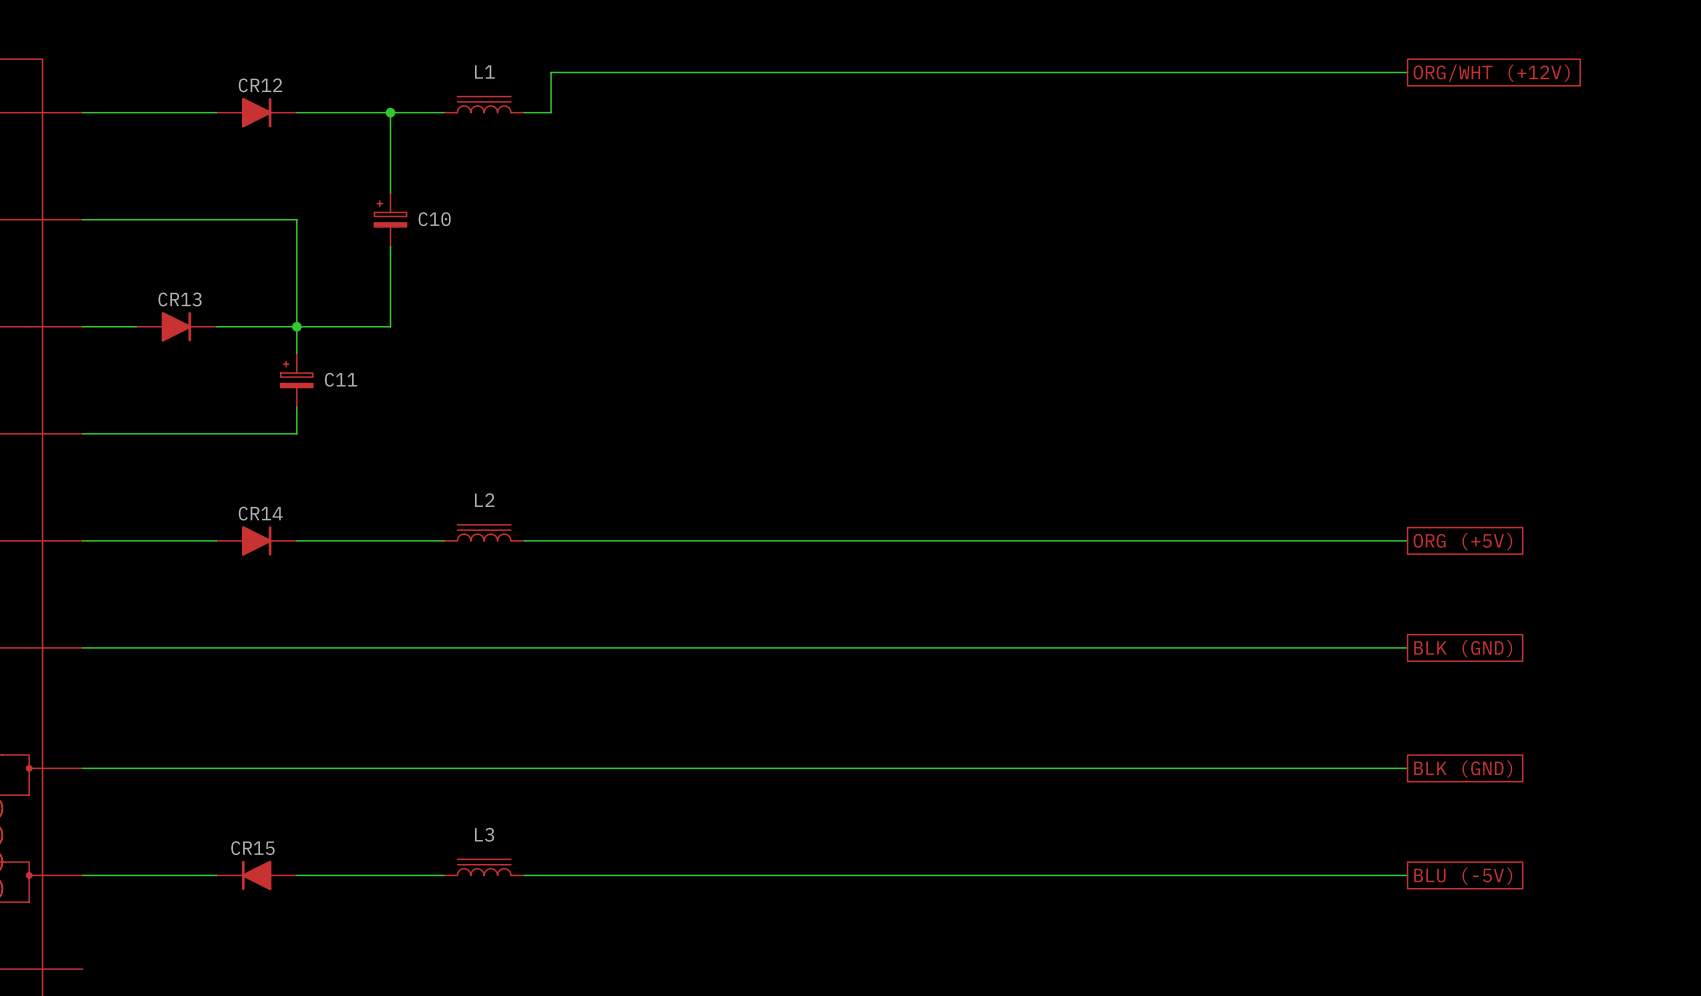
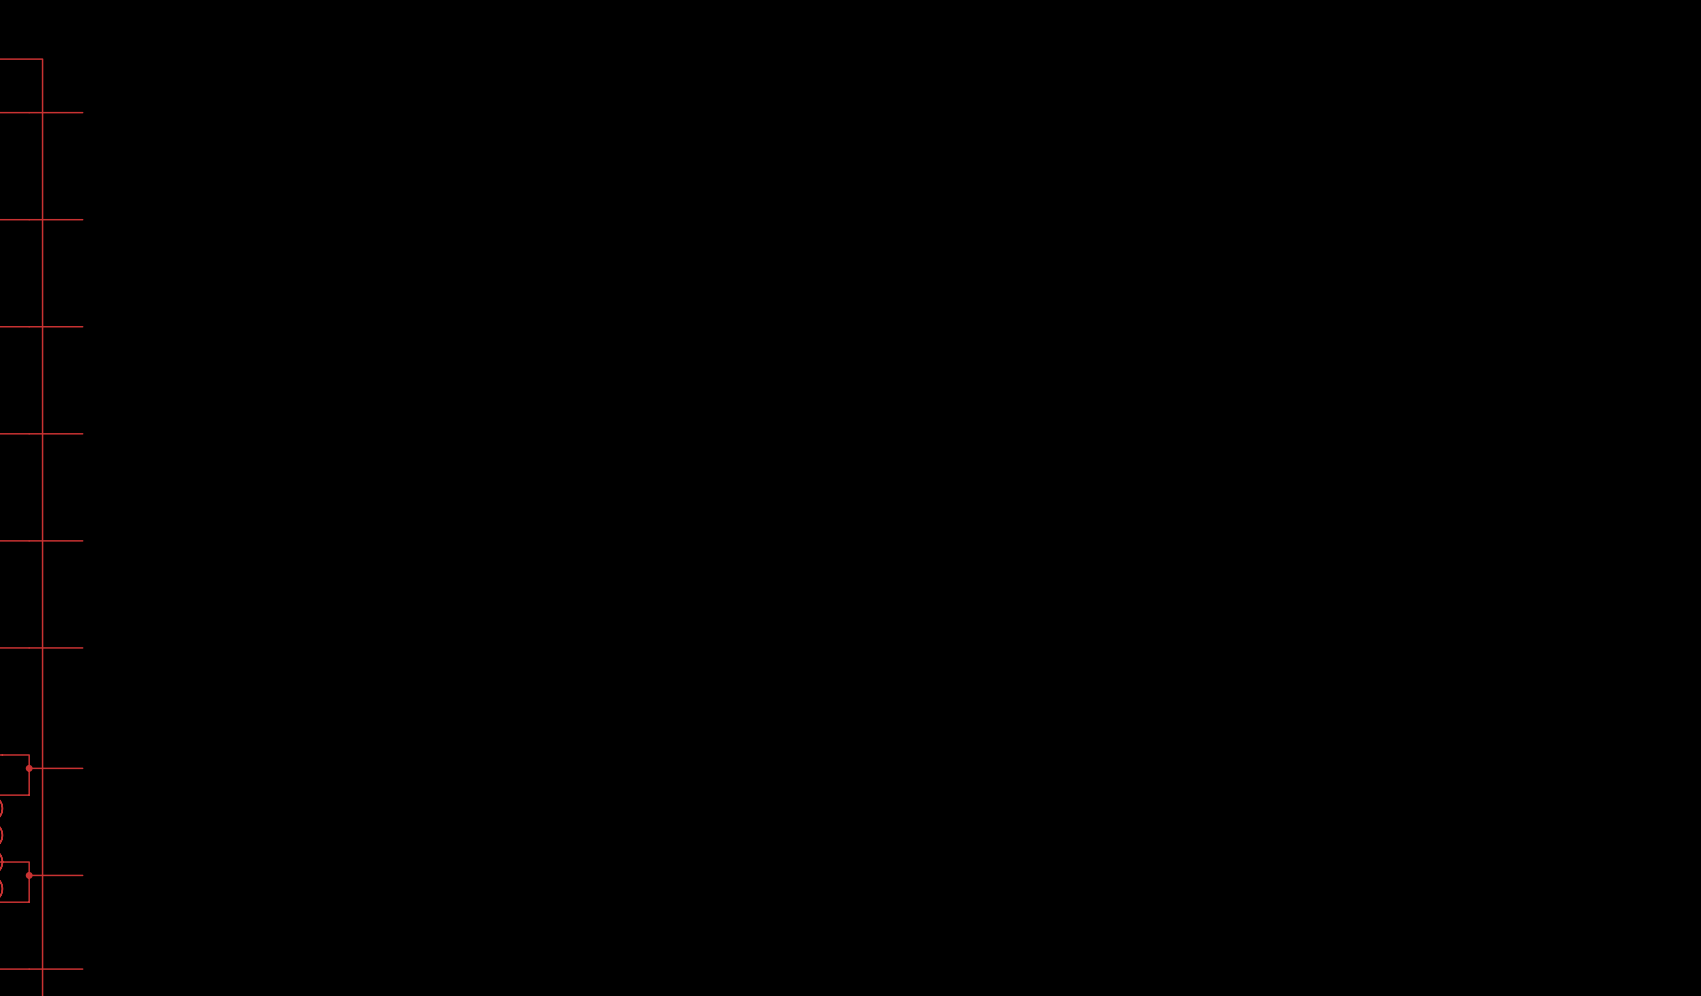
wire: (1407, 72) (551, 72) (551, 112) (524, 112) -> none
global label: ORG/WHT (+12V) (1491, 73) -> none
L1: (484, 104) -> none
wire: (82, 112) (216, 112) -> none
CR12: (256, 112) -> none
wire: (296, 112) (444, 112) -> none
wire: (390, 112) (390, 192) -> none
junction: (390, 112) -> none
wire: (82, 219) (296, 219) (296, 353) -> none
C10: (390, 219) -> none
wire: (390, 246) (390, 326) (216, 326) -> none
wire: (82, 326) (136, 326) -> none
CR13: (176, 326) -> none
junction: (296, 326) -> none
C11: (296, 380) -> none
wire: (296, 407) (296, 433) (82, 433) -> none
L2: (484, 532) -> none
wire: (82, 540) (216, 540) -> none
CR14: (256, 540) -> none
wire: (296, 540) (444, 540) -> none
wire: (524, 540) (1407, 540) -> none
global label: ORG (+5V) (1462, 541) -> none
wire: (82, 647) (1407, 647) -> none
global label: BLK (GND) (1463, 648) -> none
wire: (82, 768) (1407, 768) -> none
global label: BLK (GND) (1463, 769) -> none
L3: (484, 867) -> none
wire: (82, 875) (216, 875) -> none
CR15: (256, 875) -> none
wire: (296, 875) (444, 875) -> none
wire: (524, 875) (1407, 875) -> none
global label: BLU (-5V) (1463, 876) -> none

